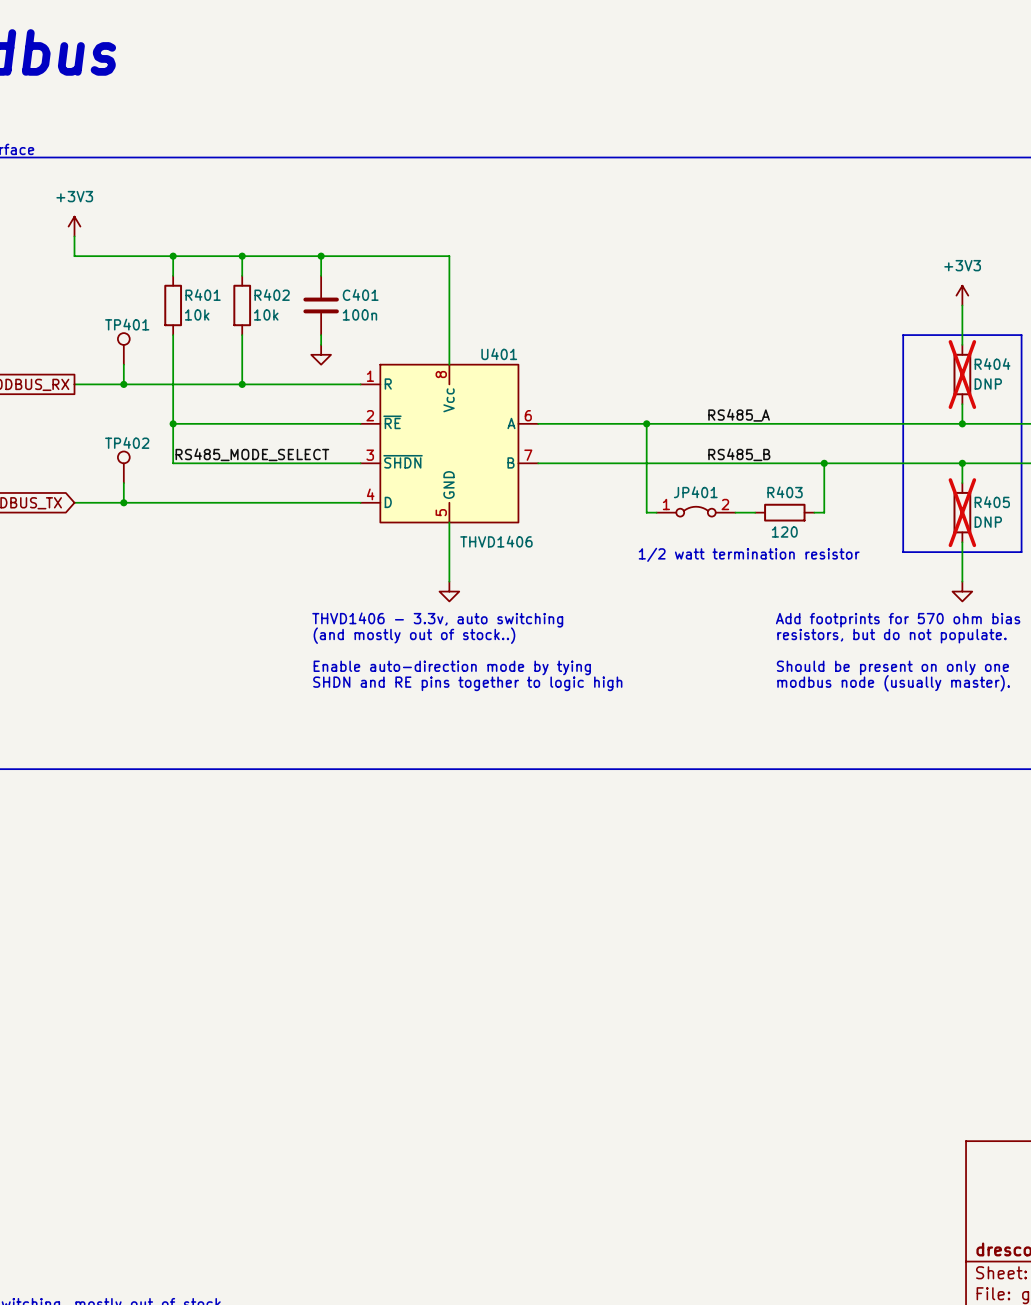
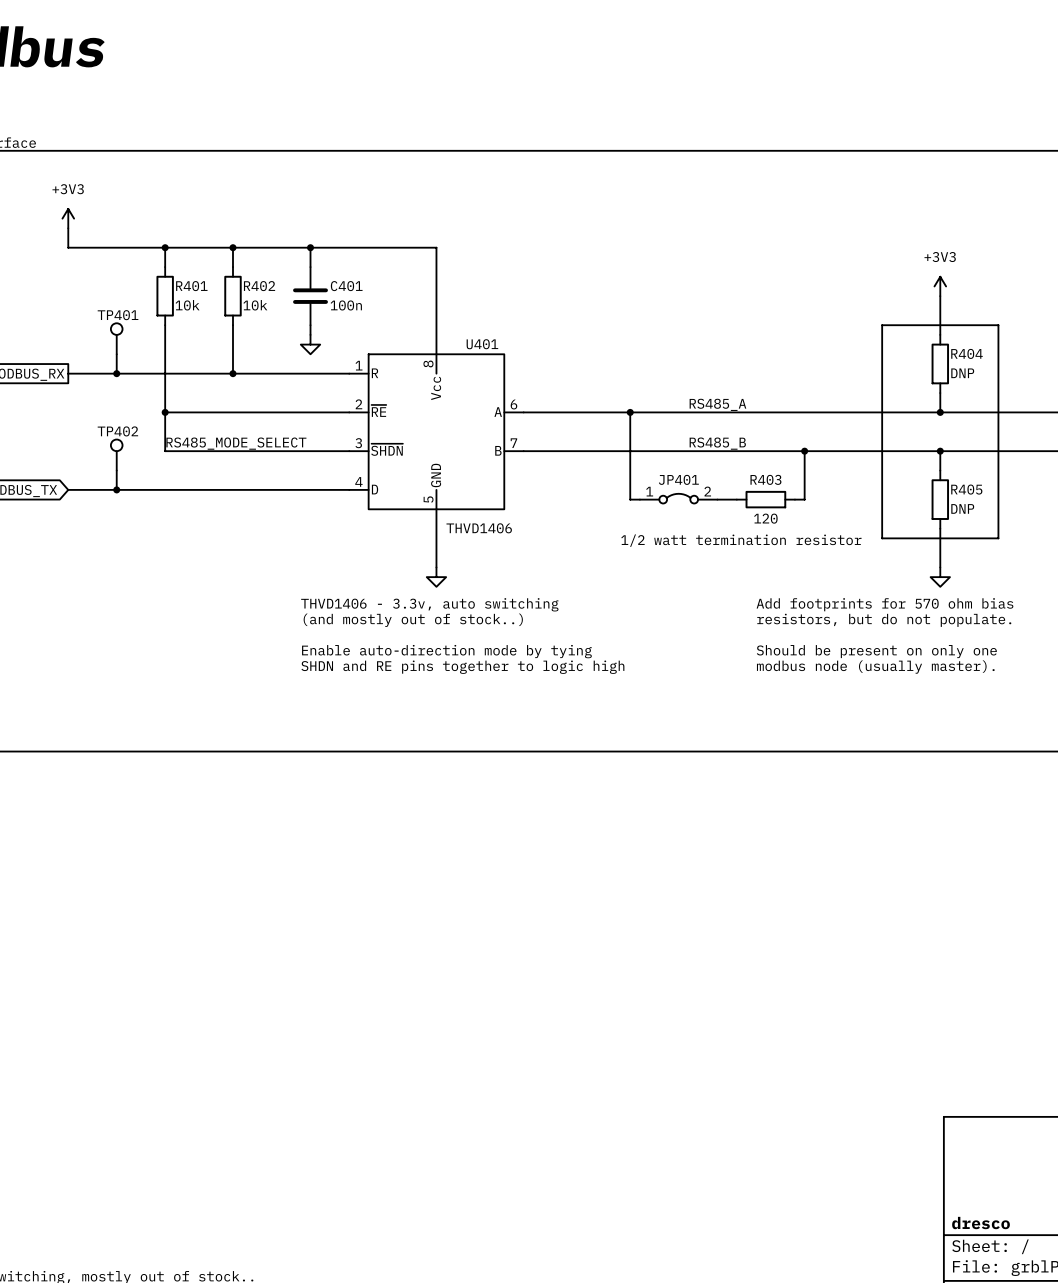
R404 do-not-place cross: (962, 374) -> none
R405 do-not-place cross: (962, 512) -> none

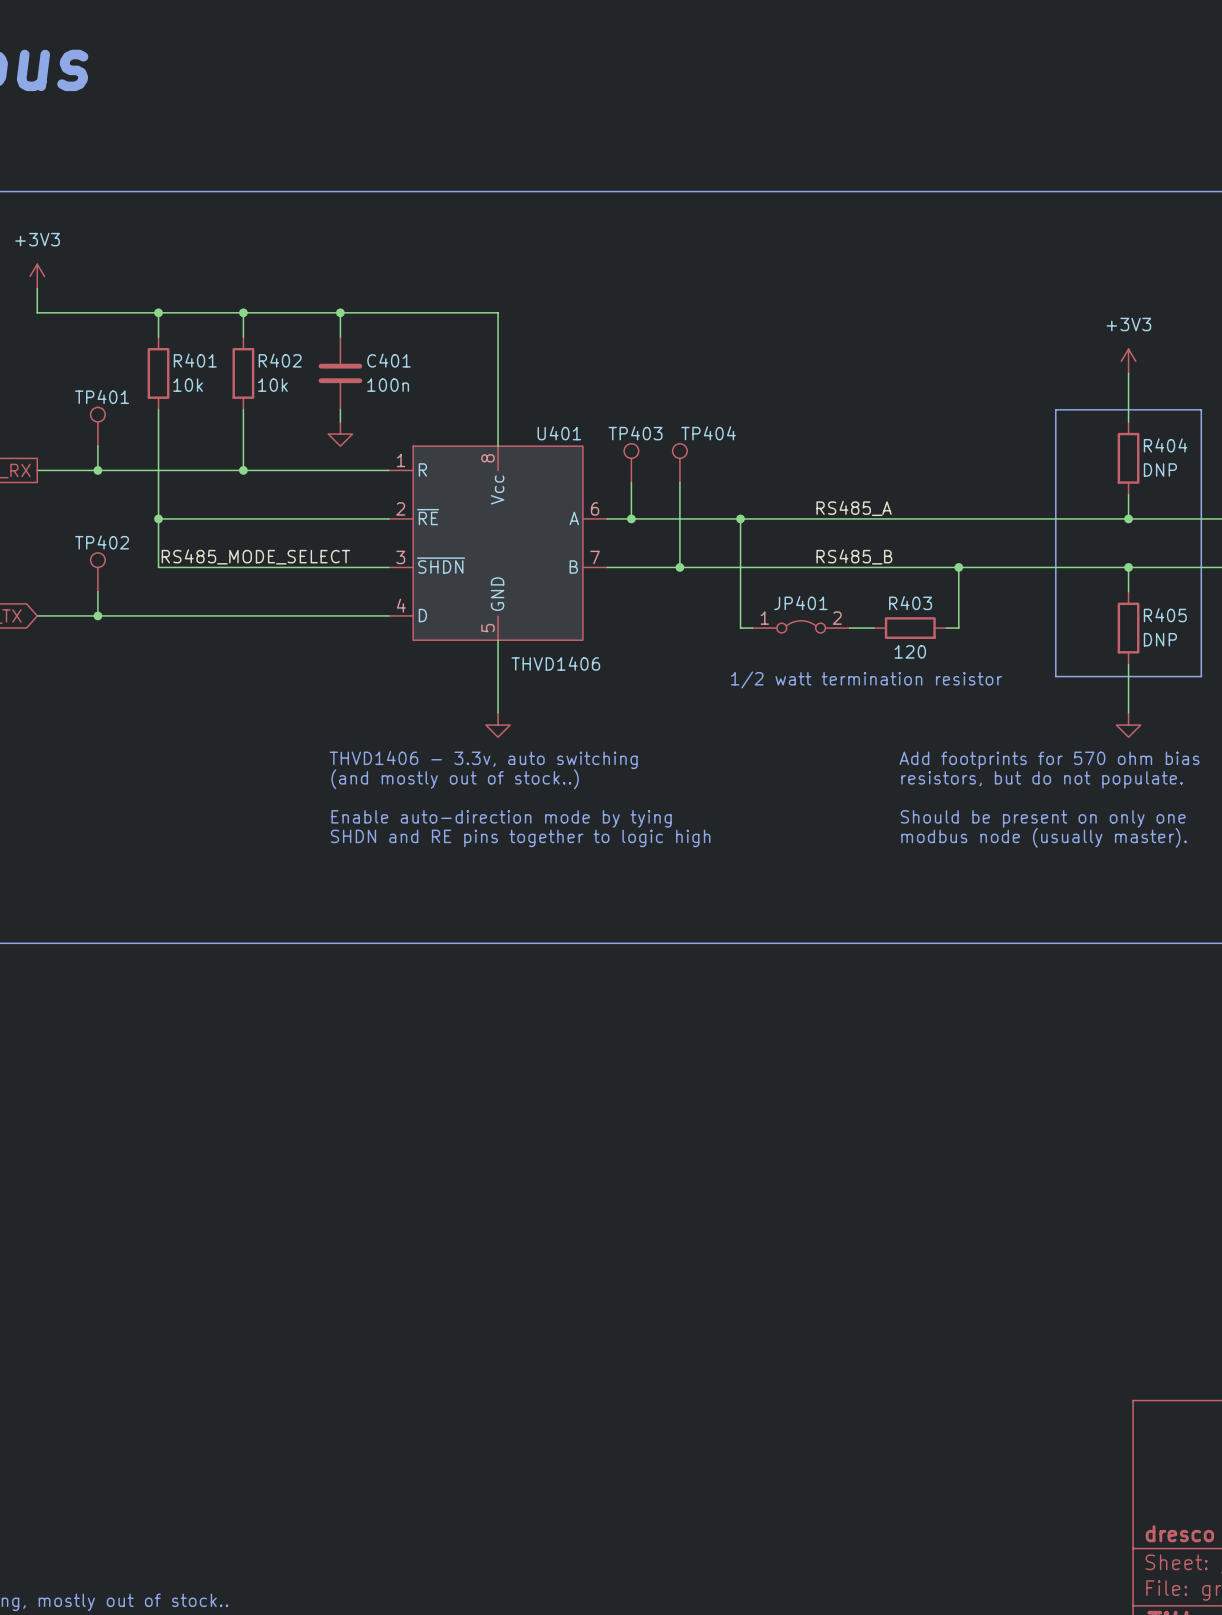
TP403: none -> (631, 463)
TP404: none -> (679, 463)
wire: none -> (631, 482) (631, 518)
wire: none -> (679, 482) (679, 567)
junction: none -> (631, 518)
junction: none -> (679, 567)

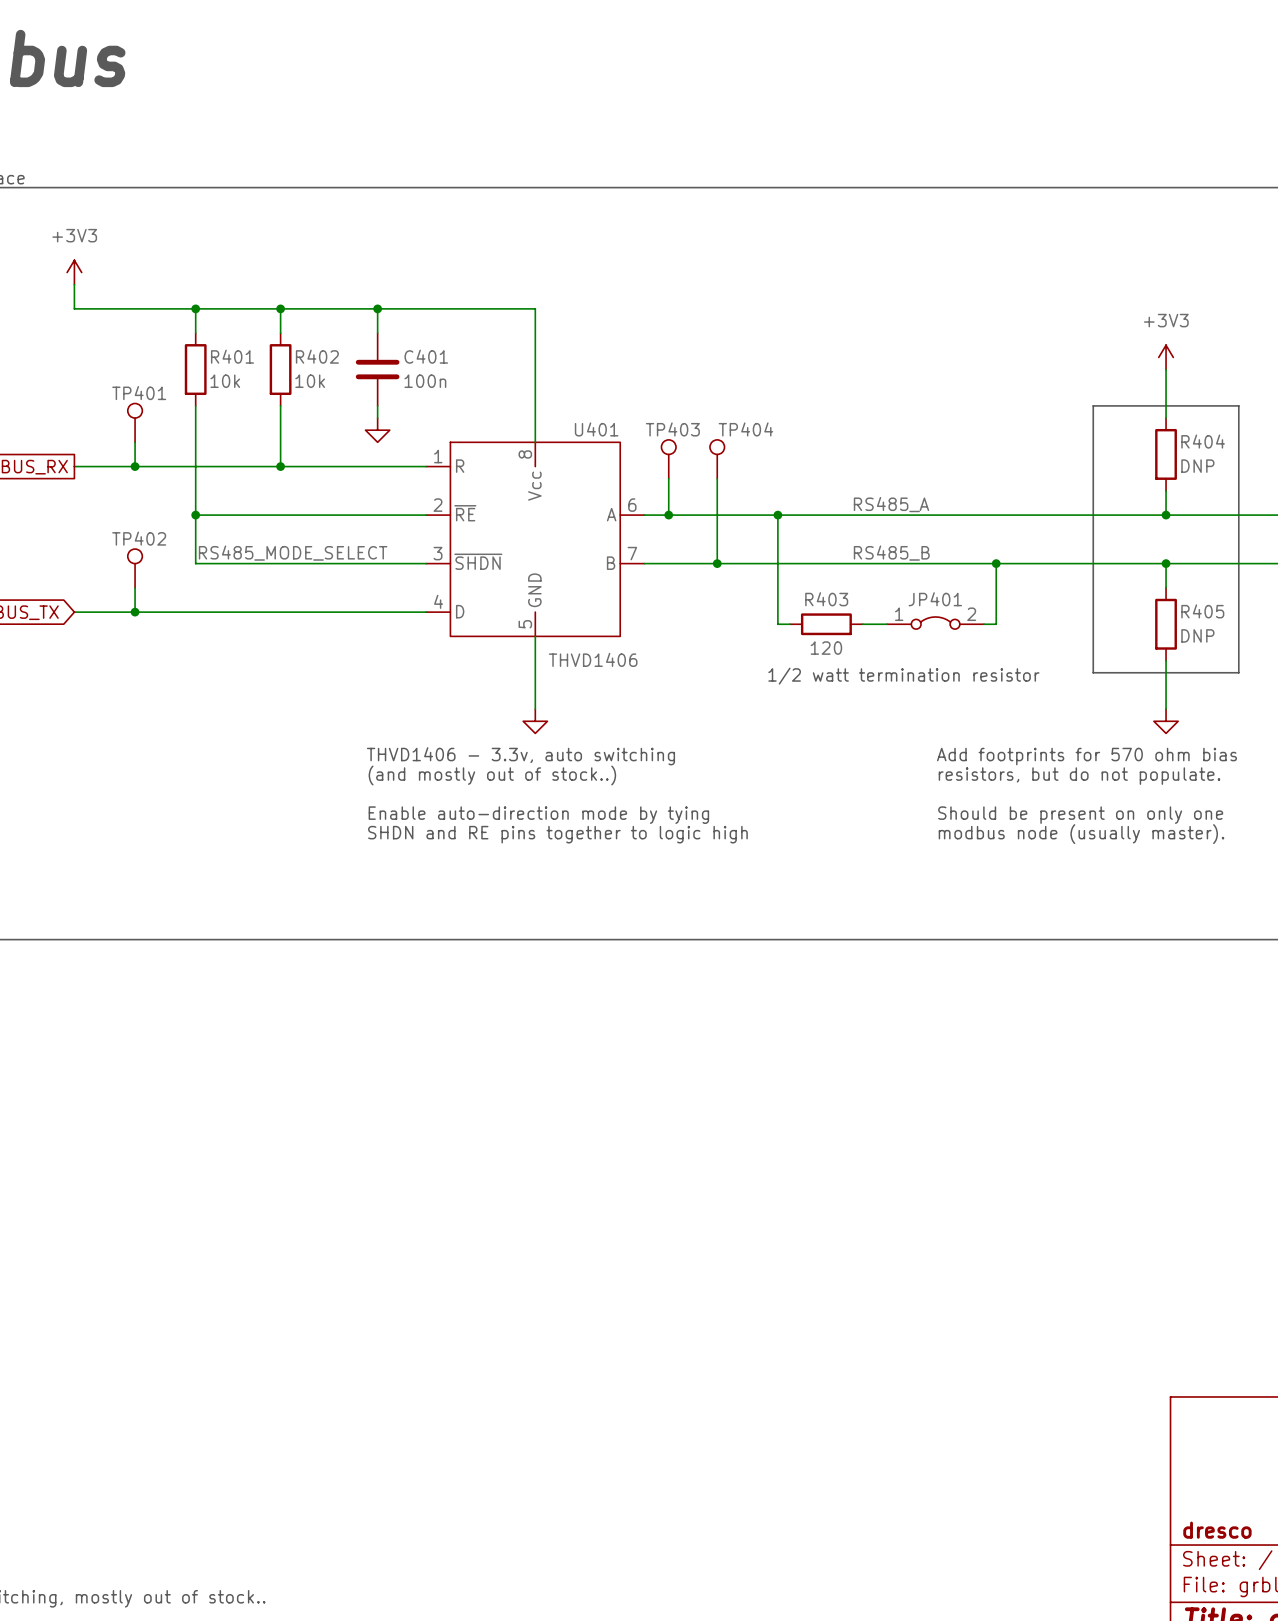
JP401 position: (801, 626) -> (935, 623)
R403 position: (910, 628) -> (826, 624)

